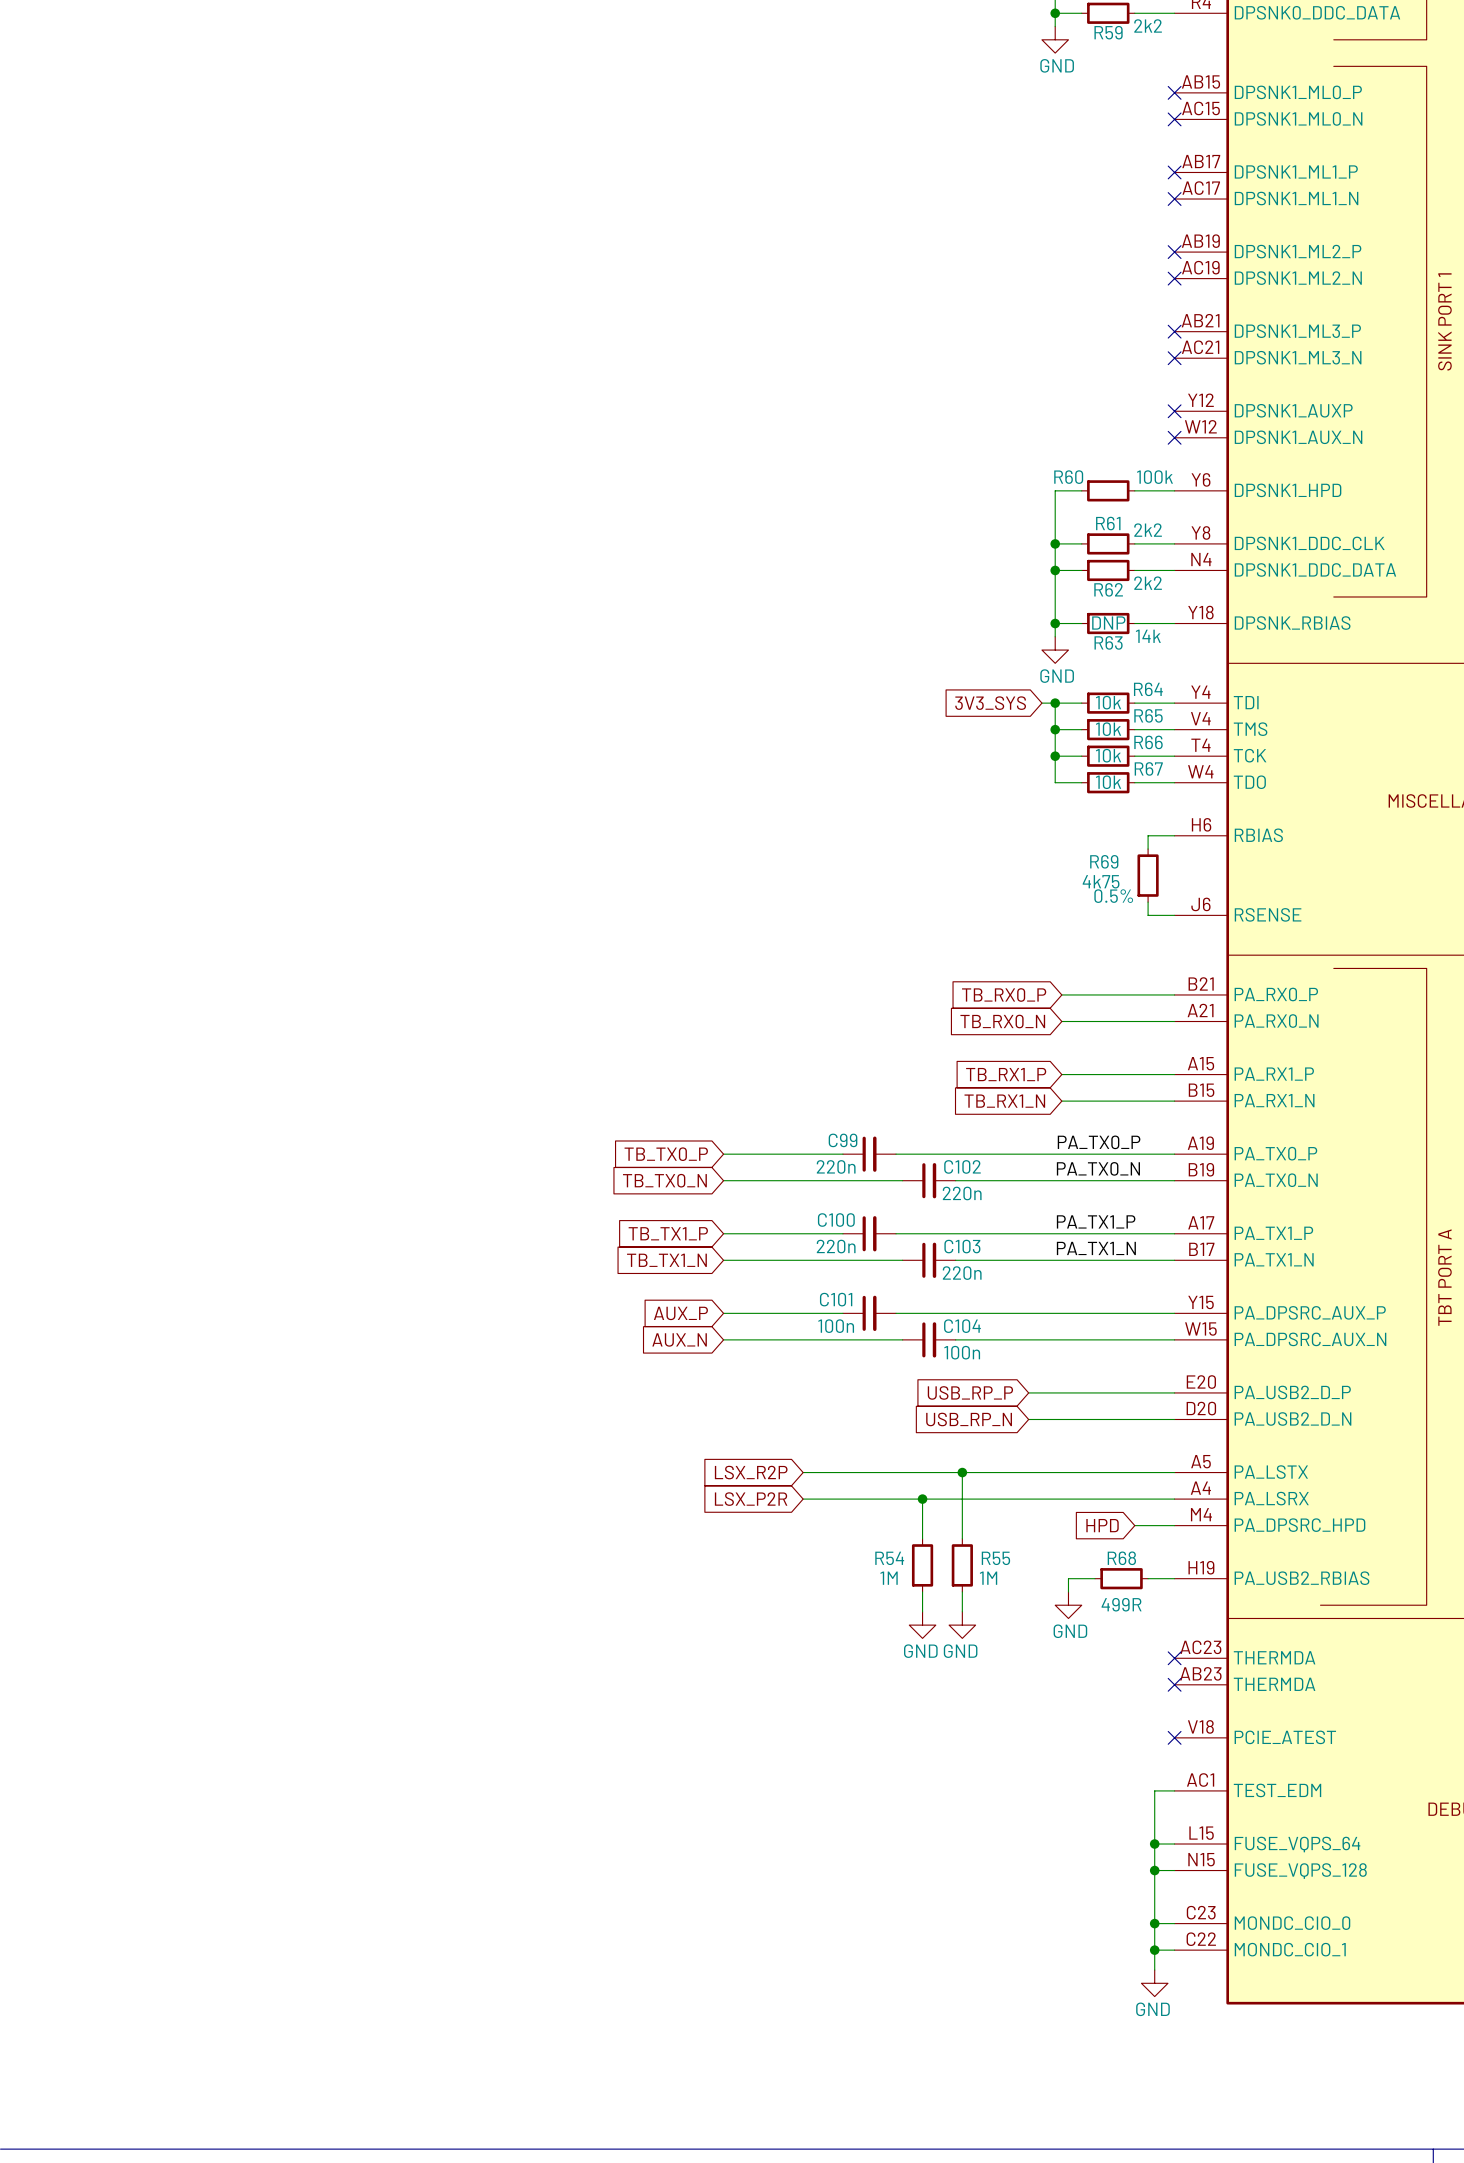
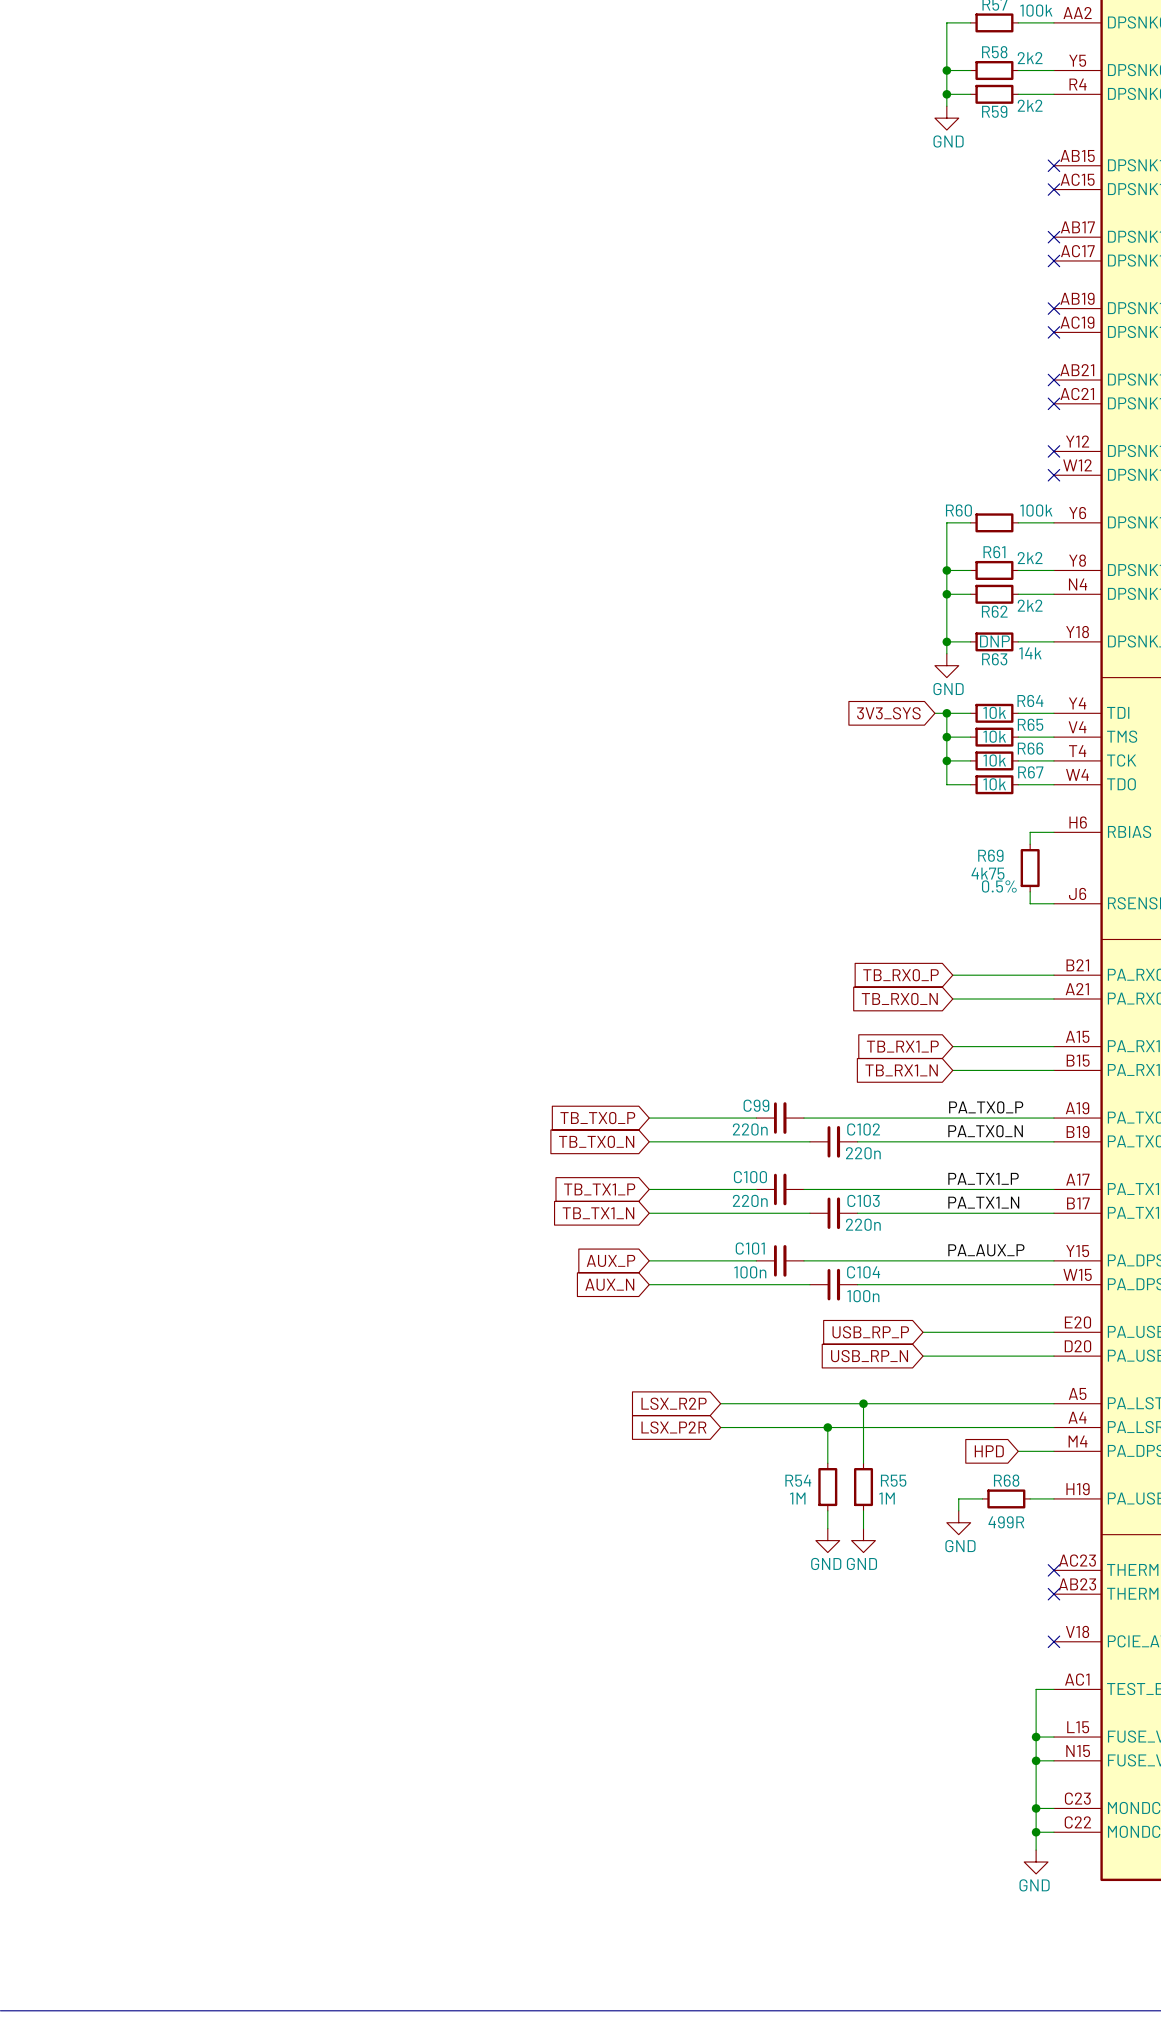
label: none -> PA_AUX_P (986, 1250)

